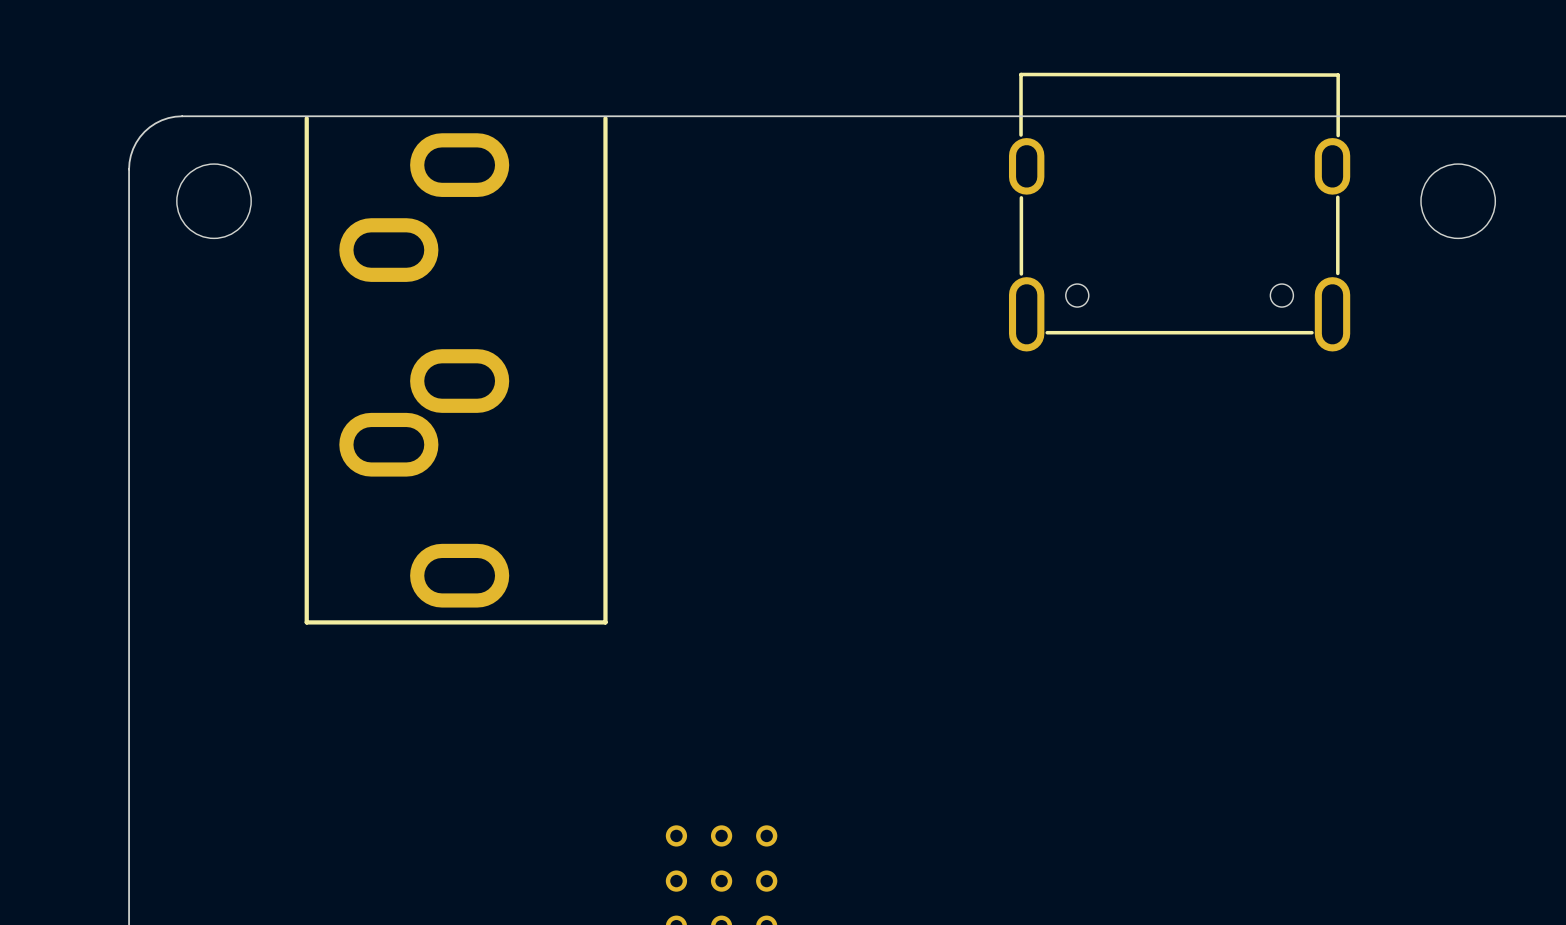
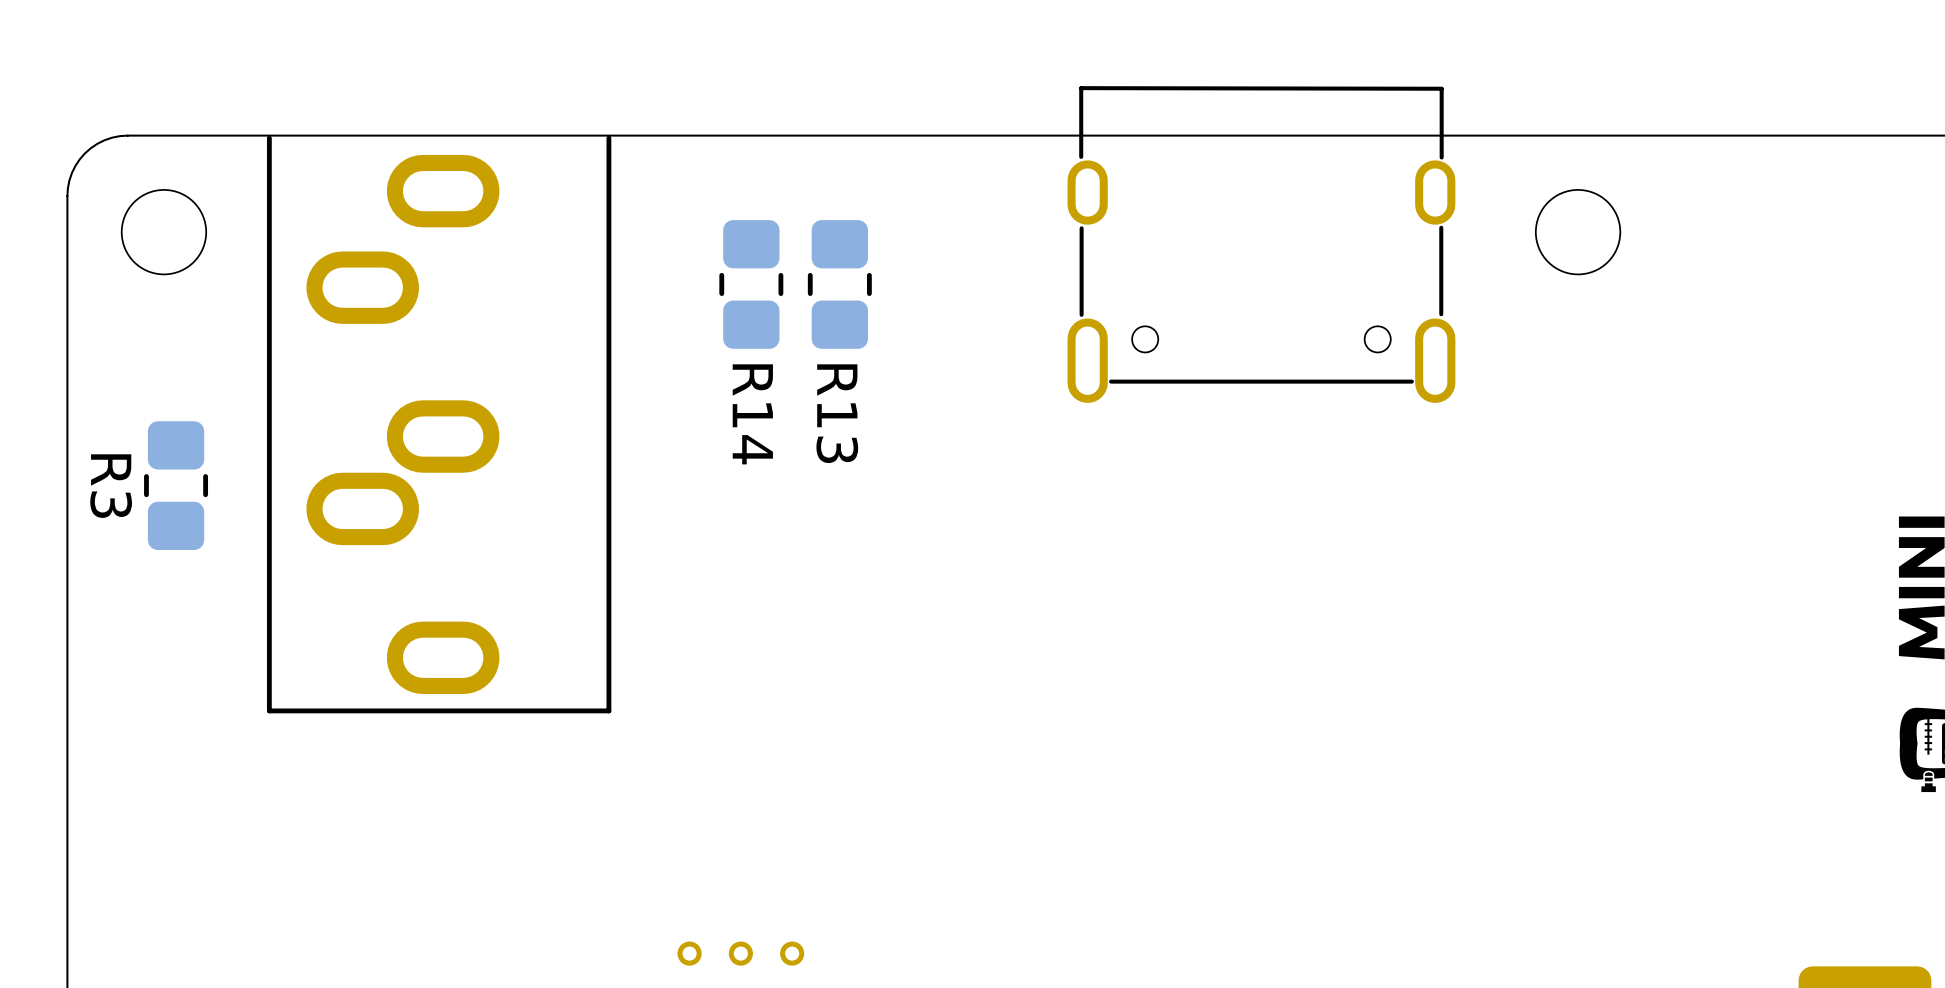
R14: none -> (751, 284)
R13: none -> (839, 284)
R3: none -> (176, 485)

